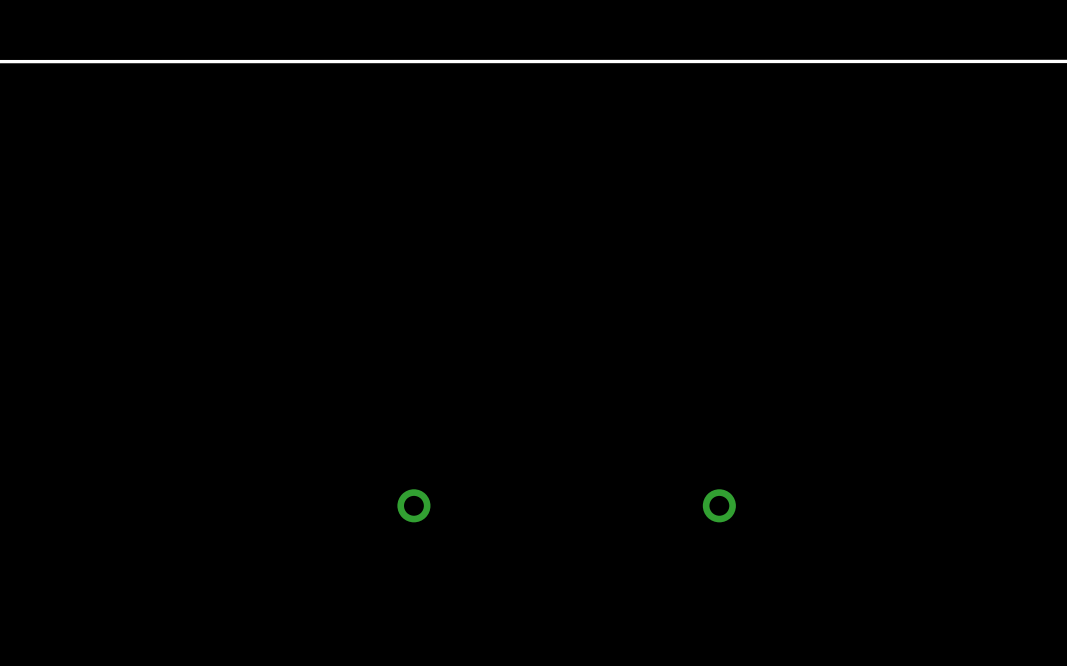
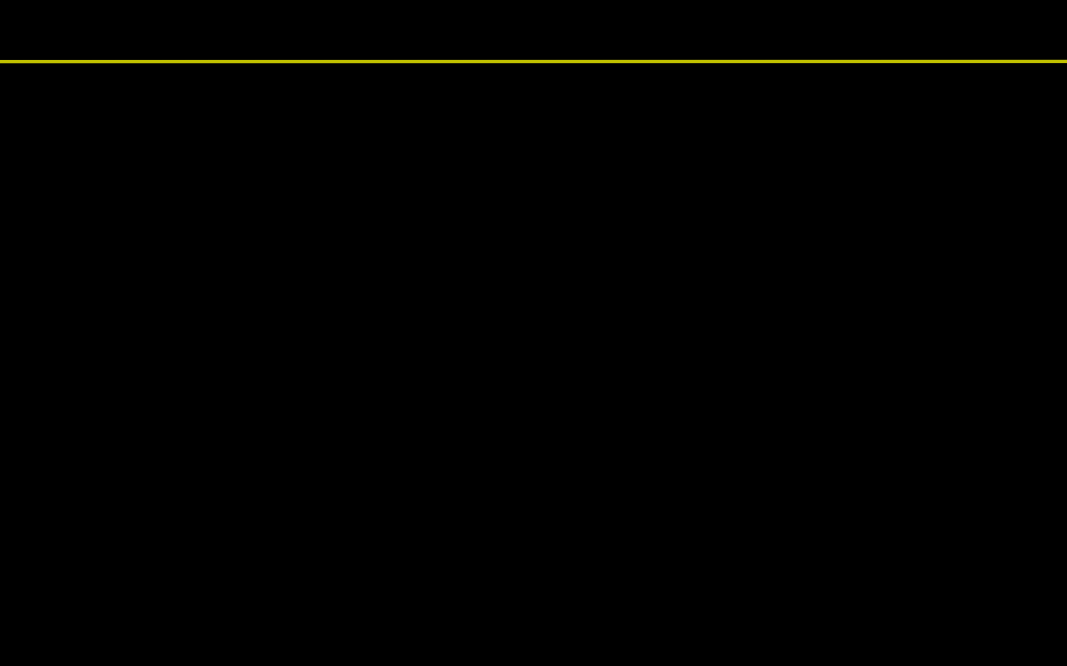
via: (413, 505) -> none
via: (719, 505) -> none

